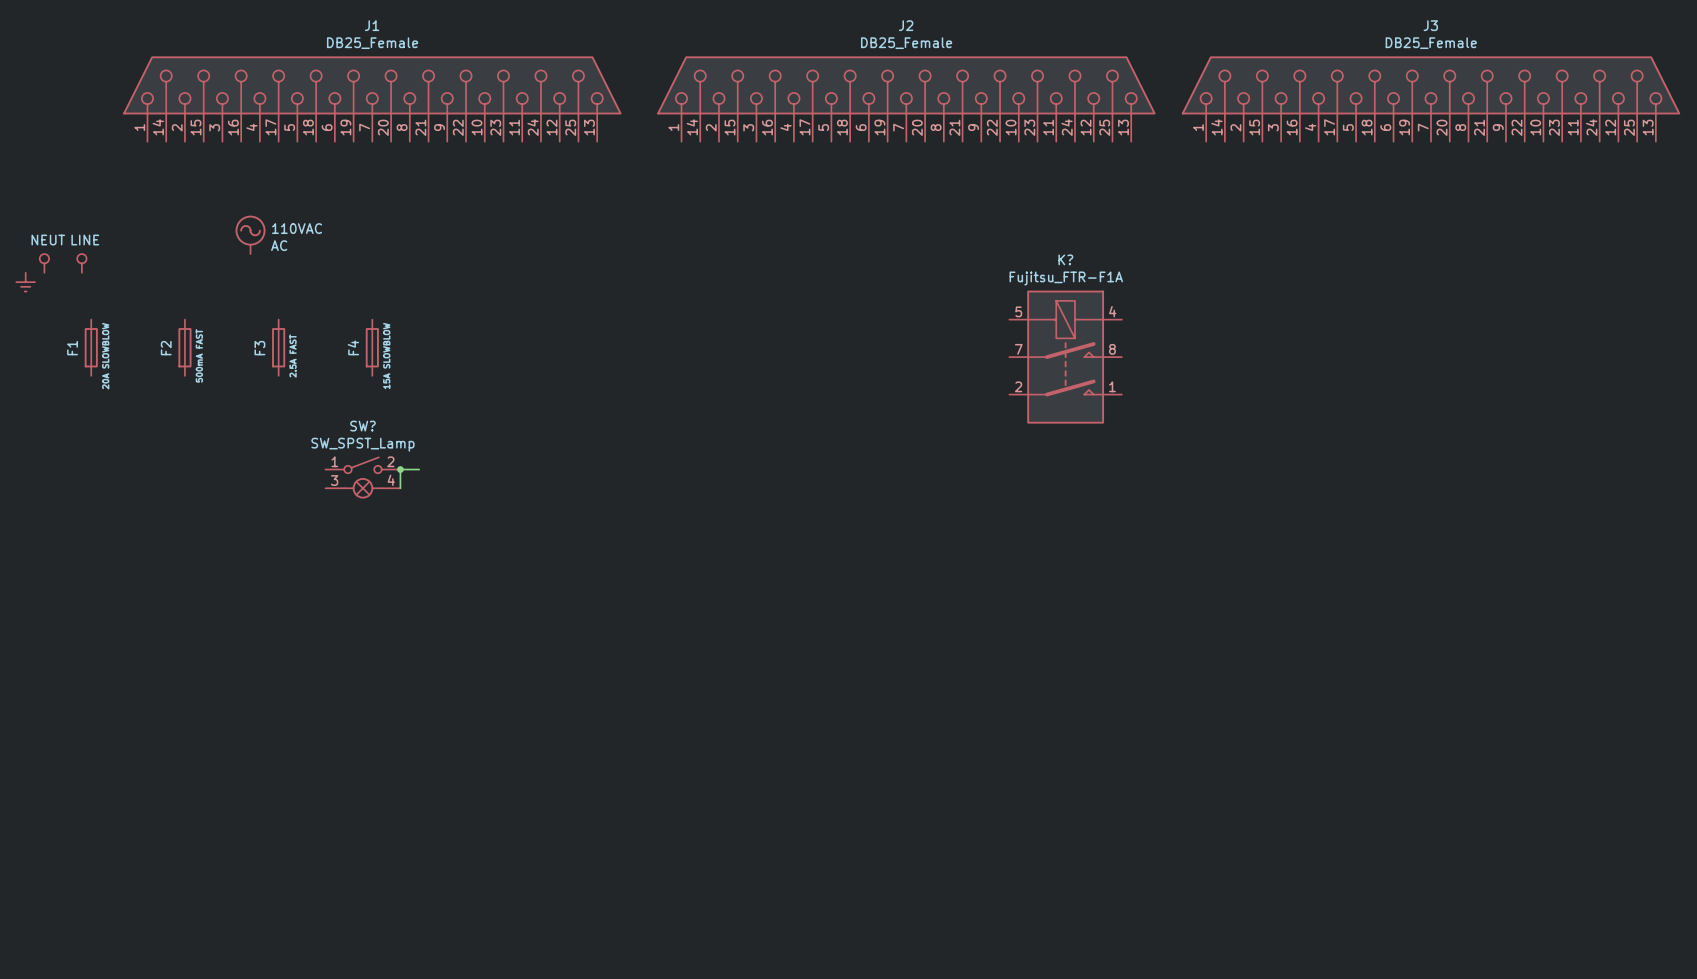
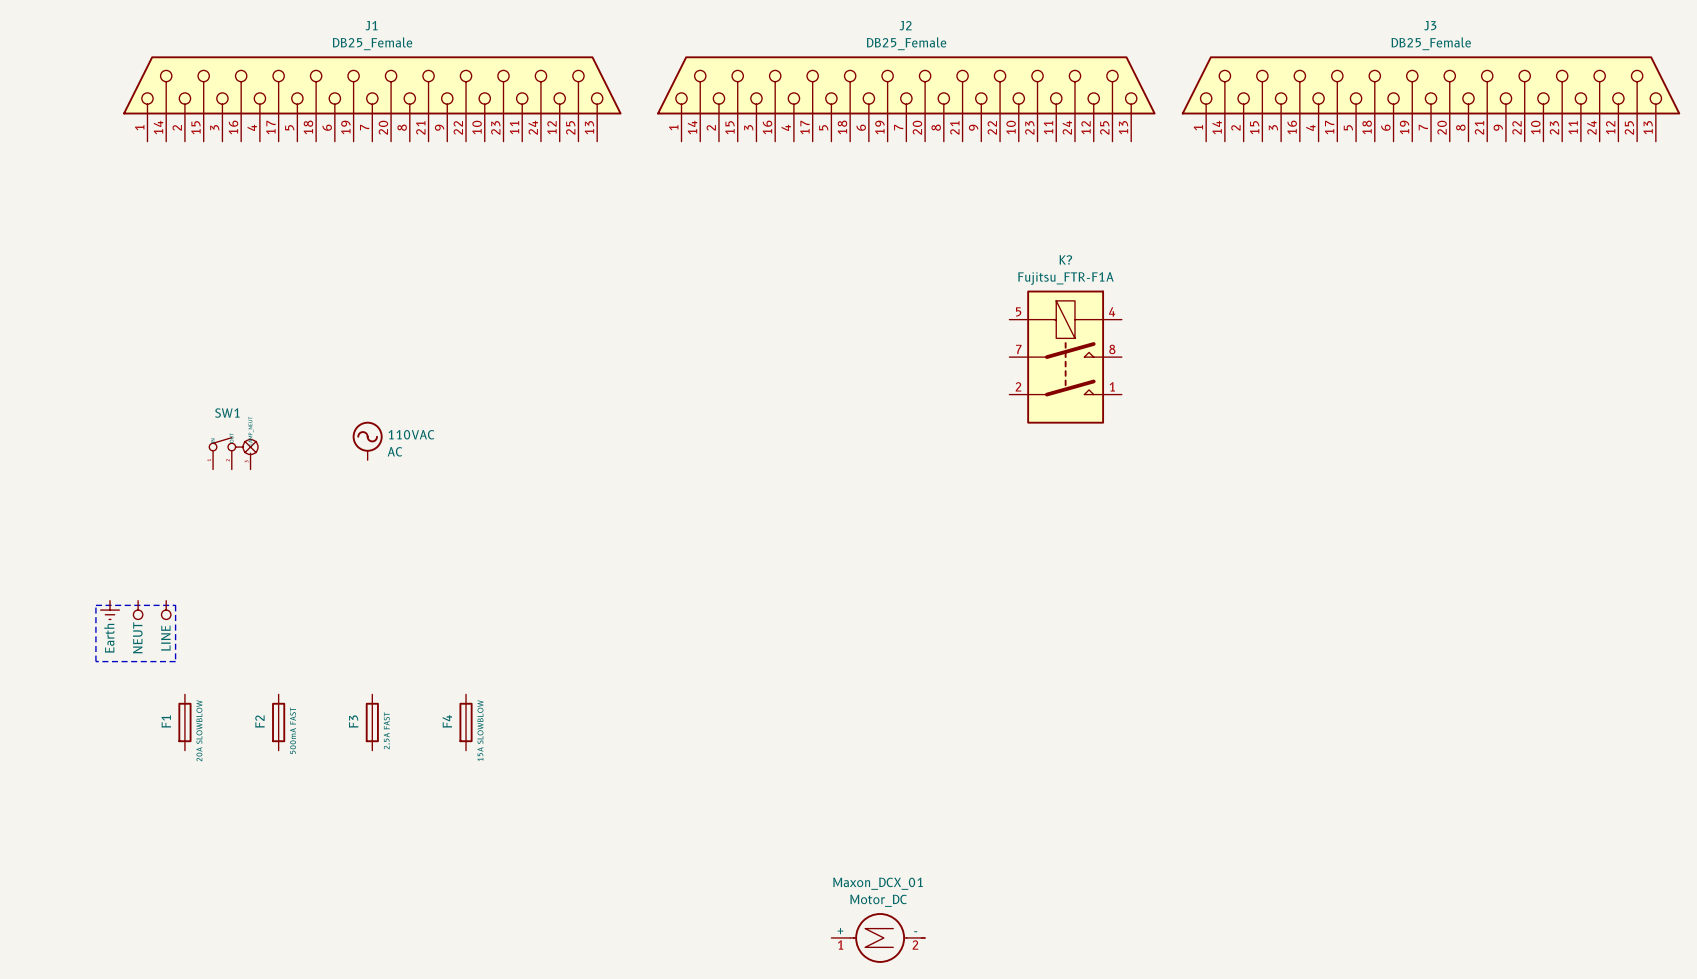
110VAC position: AC (250, 234) -> AC (367, 440)
power symbol: NEUT (44, 263) -> none
power symbol: LINE (81, 263) -> none
power symbol: (25, 282) -> none
F1 position: (91, 347) -> (184, 722)
F2 position: (184, 347) -> (278, 722)
F3 position: (278, 347) -> (372, 722)
F4 position: (372, 347) -> (466, 722)
SW1: none -> (233, 453)
junction: (400, 469) -> none
wire: (419, 469) (400, 469) (400, 488) -> none
SW?: SW_SPST_Lamp (362, 477) -> none
line: none -> (95, 605) (175, 605) (175, 661) (95, 661) (95, 605)
power symbol: none -> Earth (110, 610)
power symbol: none -> NEUT (138, 610)
power symbol: none -> LINE (166, 610)
Maxon_DCX_01: none -> Motor_DC (878, 937)

